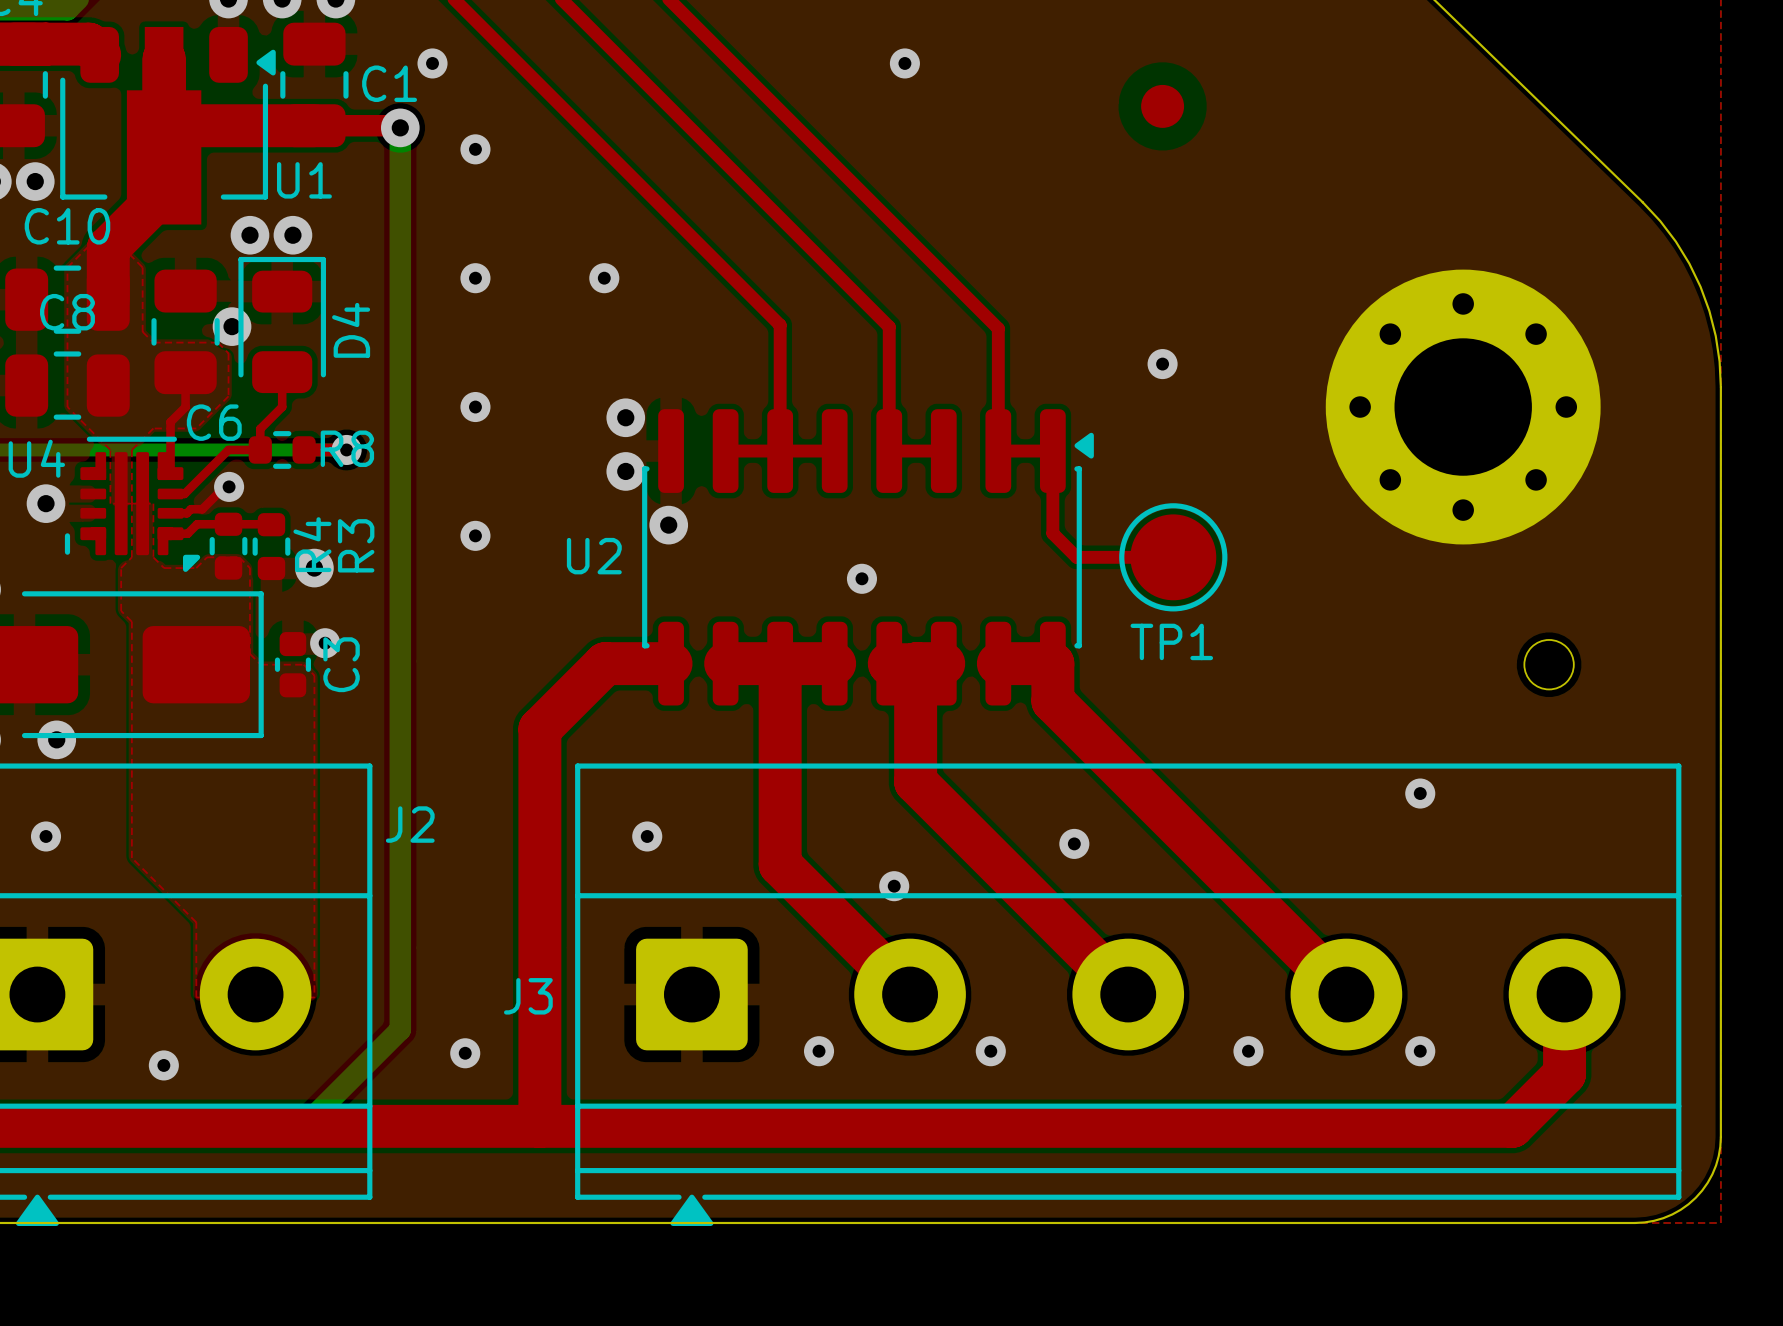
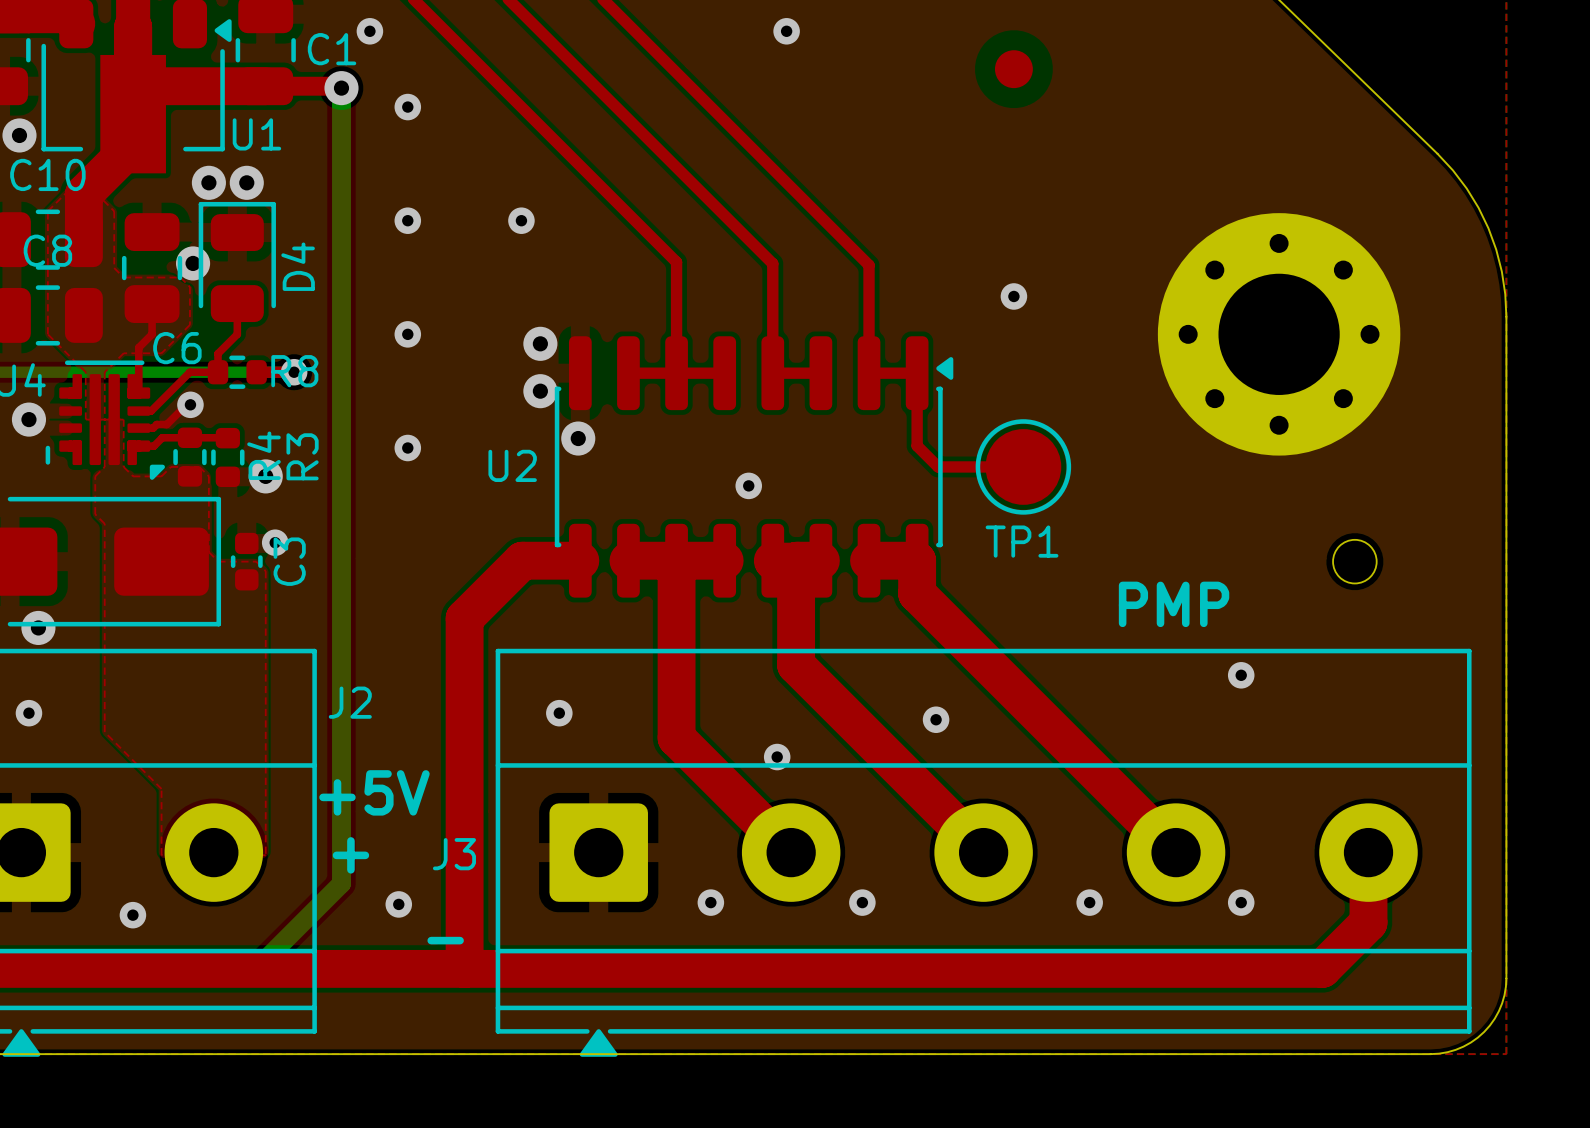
text: none -> PMP (1174, 604)
text: none -> +5V (374, 792)
text: none -> + (350, 855)
text: none -> - (445, 940)

